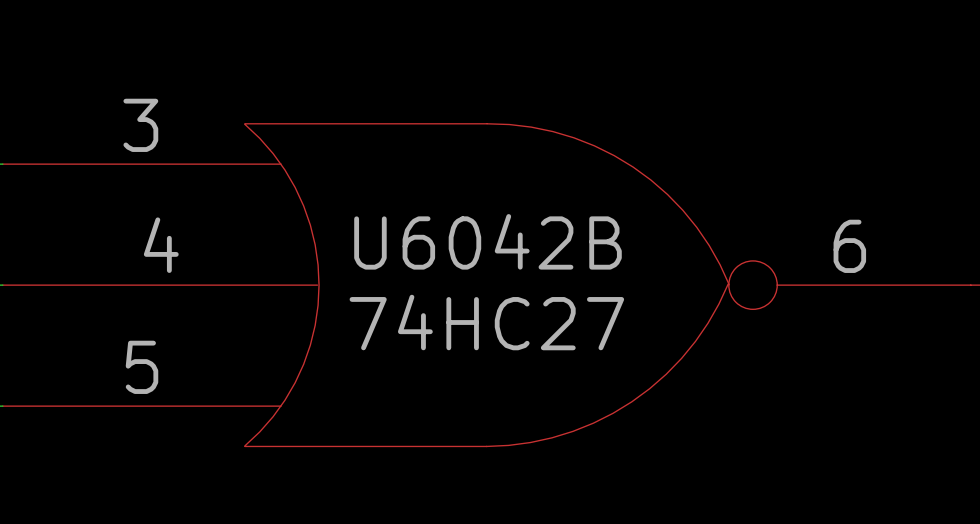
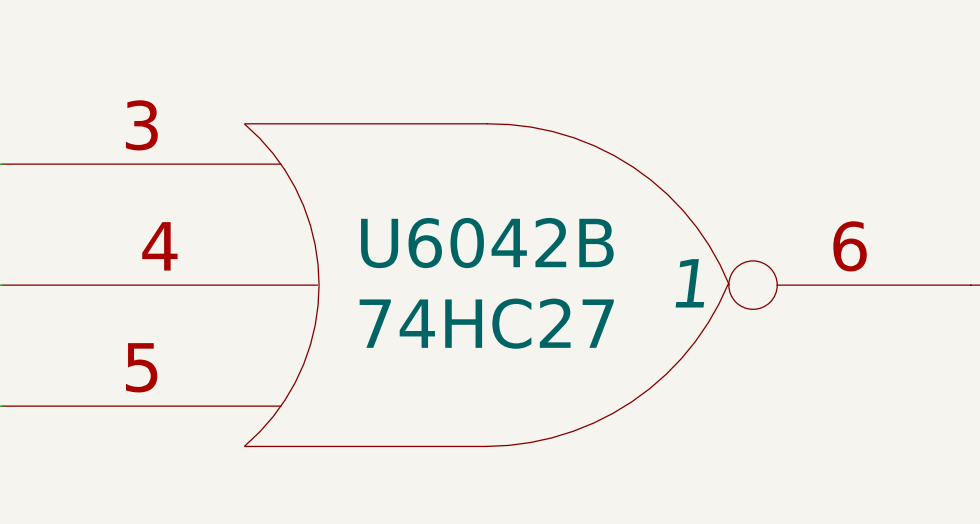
U6042B text: none -> 1 (689, 283)

